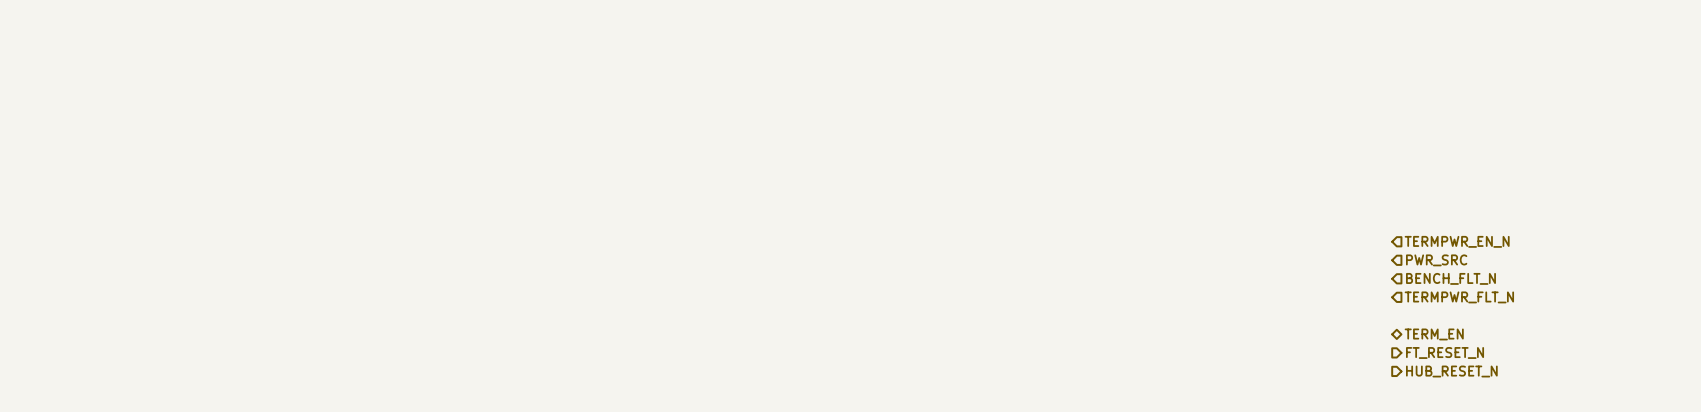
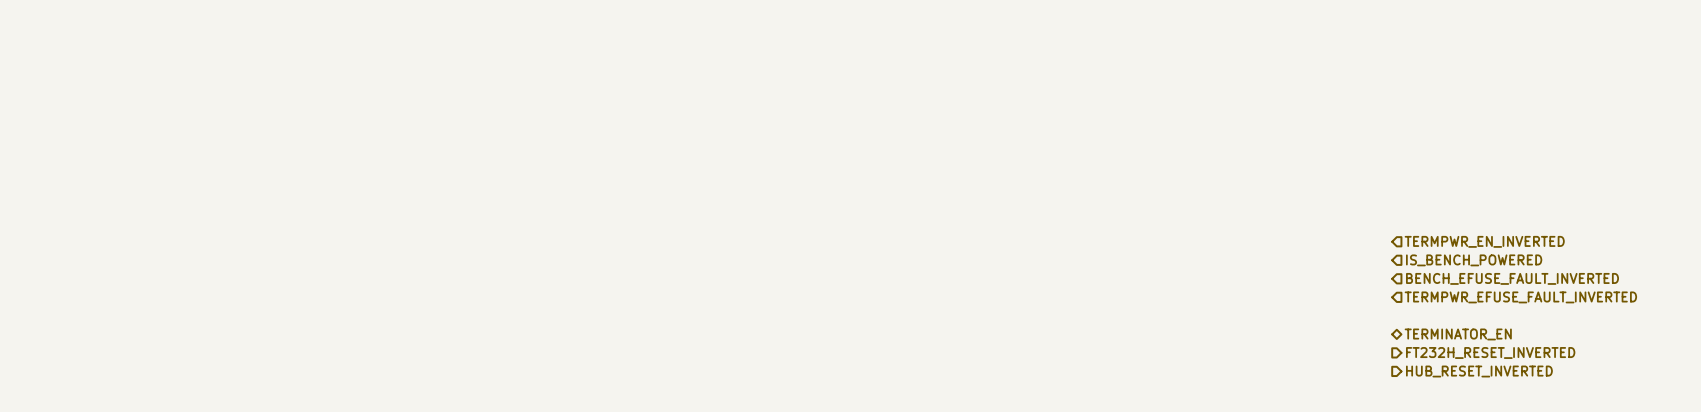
hierarchical label: TERMPWR_EN_N (1457, 241) -> TERMPWR_EN_INVERTED (1484, 241)
hierarchical label: PWR_SRC (1436, 260) -> IS_BENCH_POWERED (1474, 260)
hierarchical label: BENCH_FLT_N (1450, 278) -> BENCH_EFUSE_FAULT_INVERTED (1512, 278)
hierarchical label: TERMPWR_FLT_N (1459, 297) -> TERMPWR_EFUSE_FAULT_INVERTED (1520, 297)
hierarchical label: TERM_EN (1434, 334) -> TERMINATOR_EN (1458, 334)
hierarchical label: FT_RESET_N (1445, 352) -> FT232H_RESET_INVERTED (1490, 352)
hierarchical label: HUB_RESET_N (1451, 371) -> HUB_RESET_INVERTED (1479, 371)

